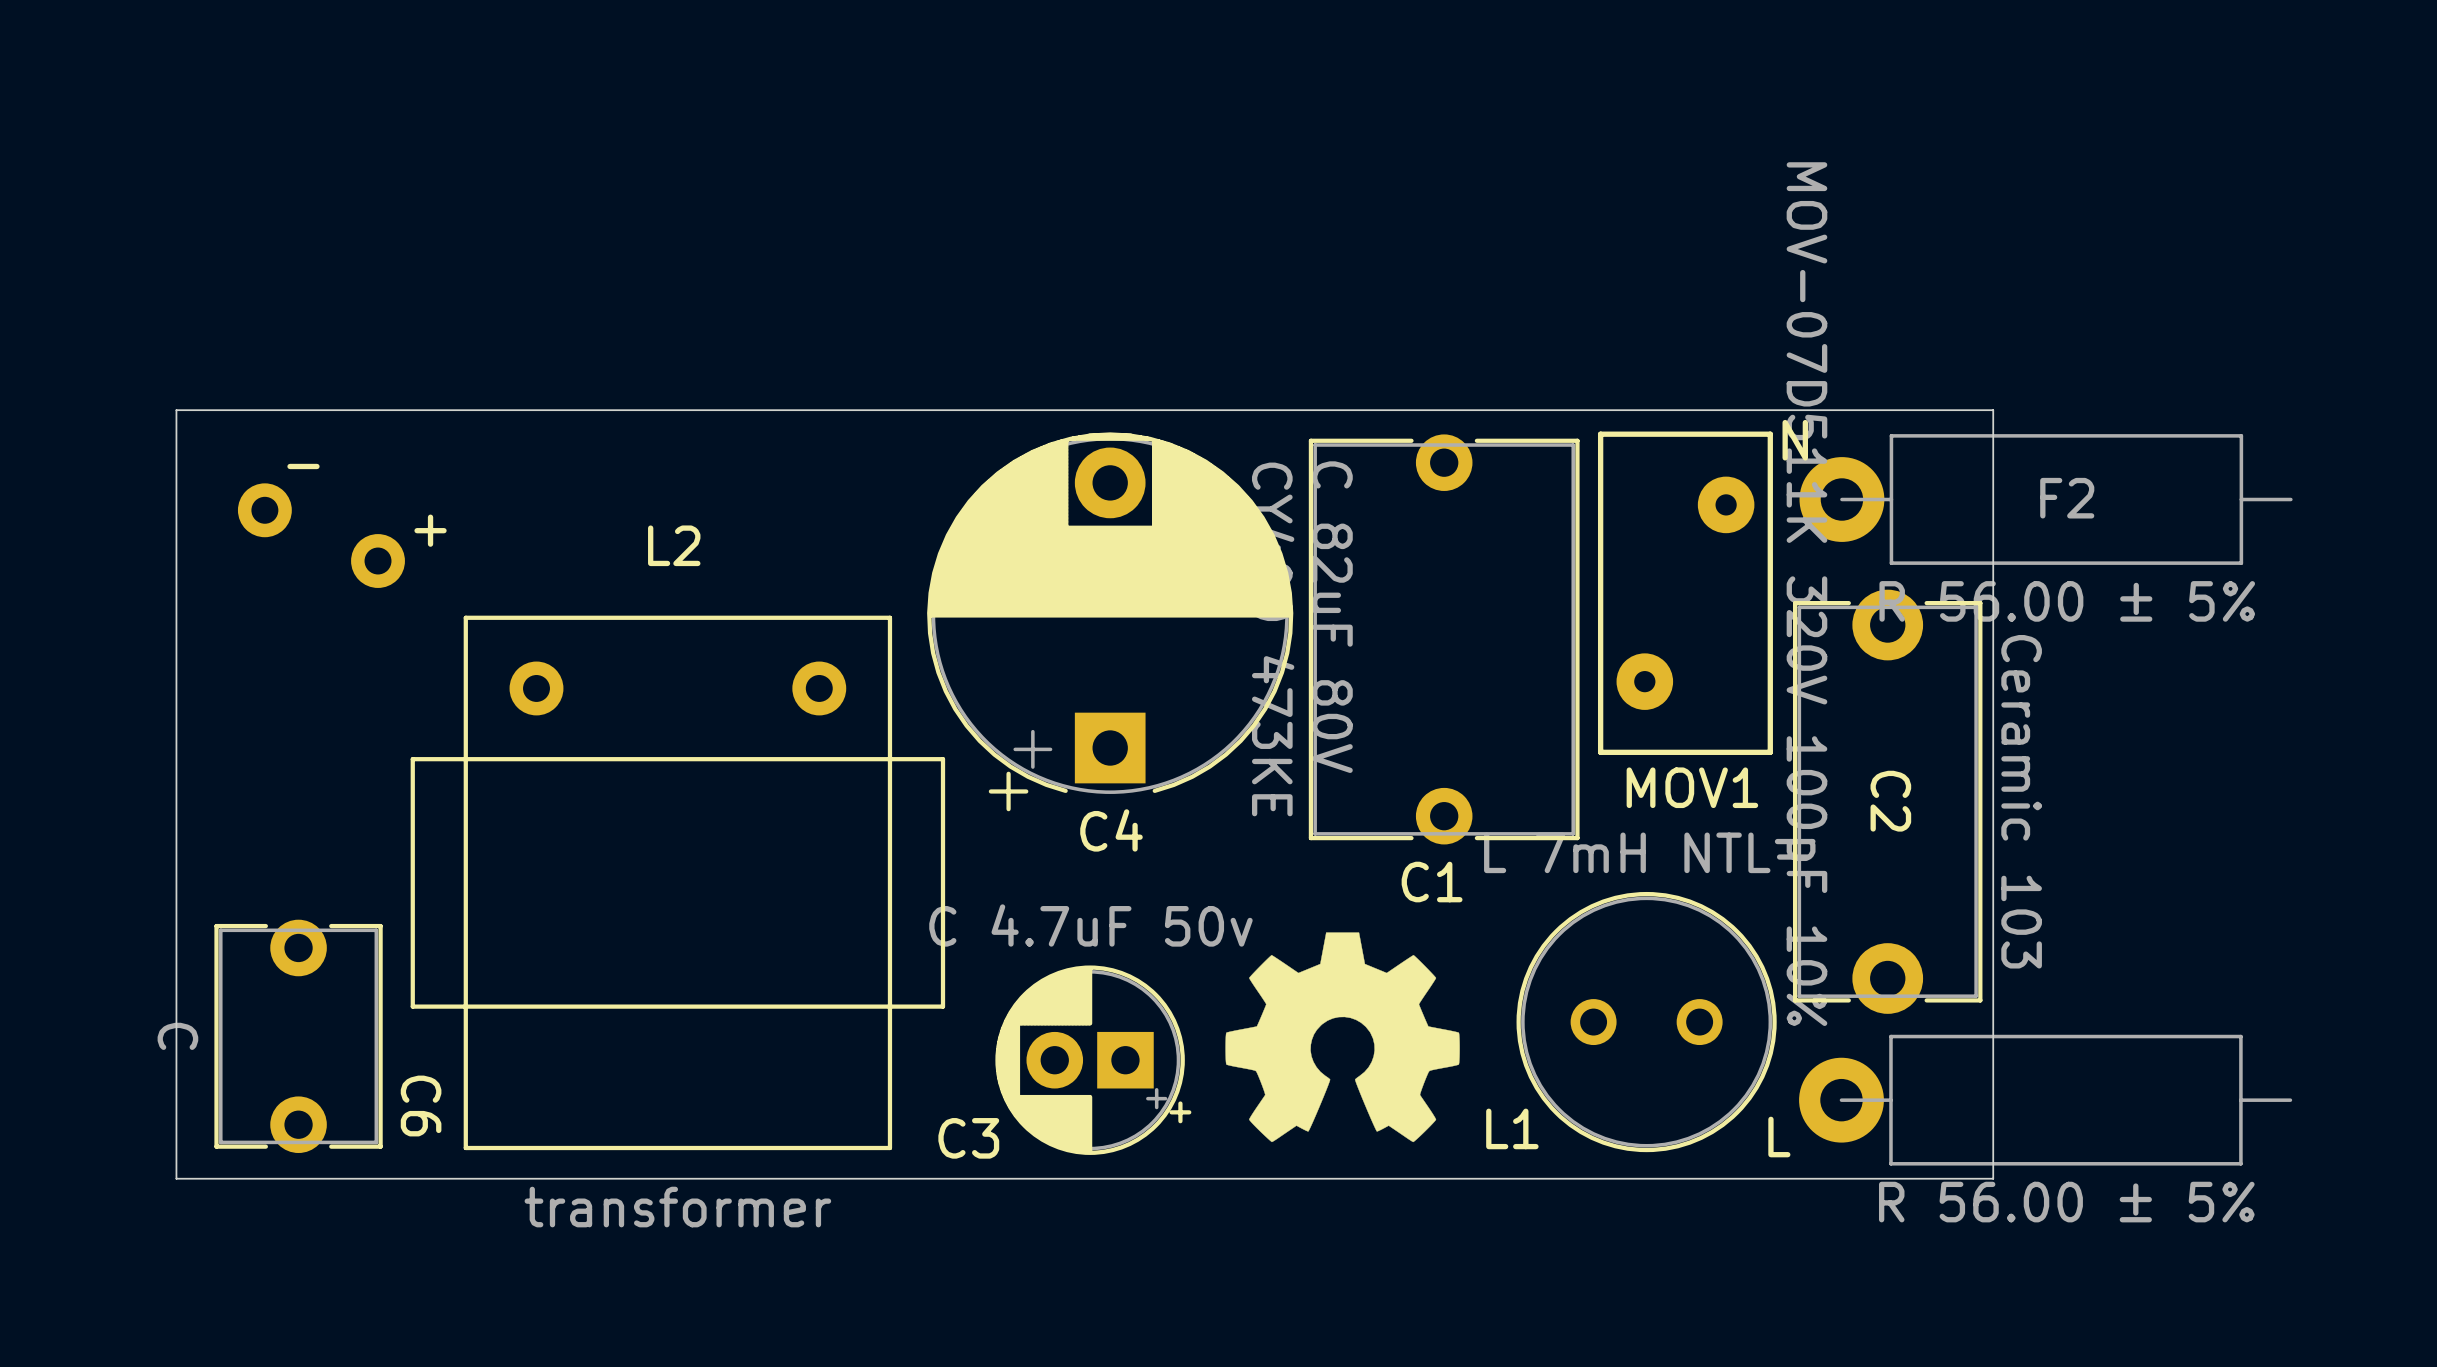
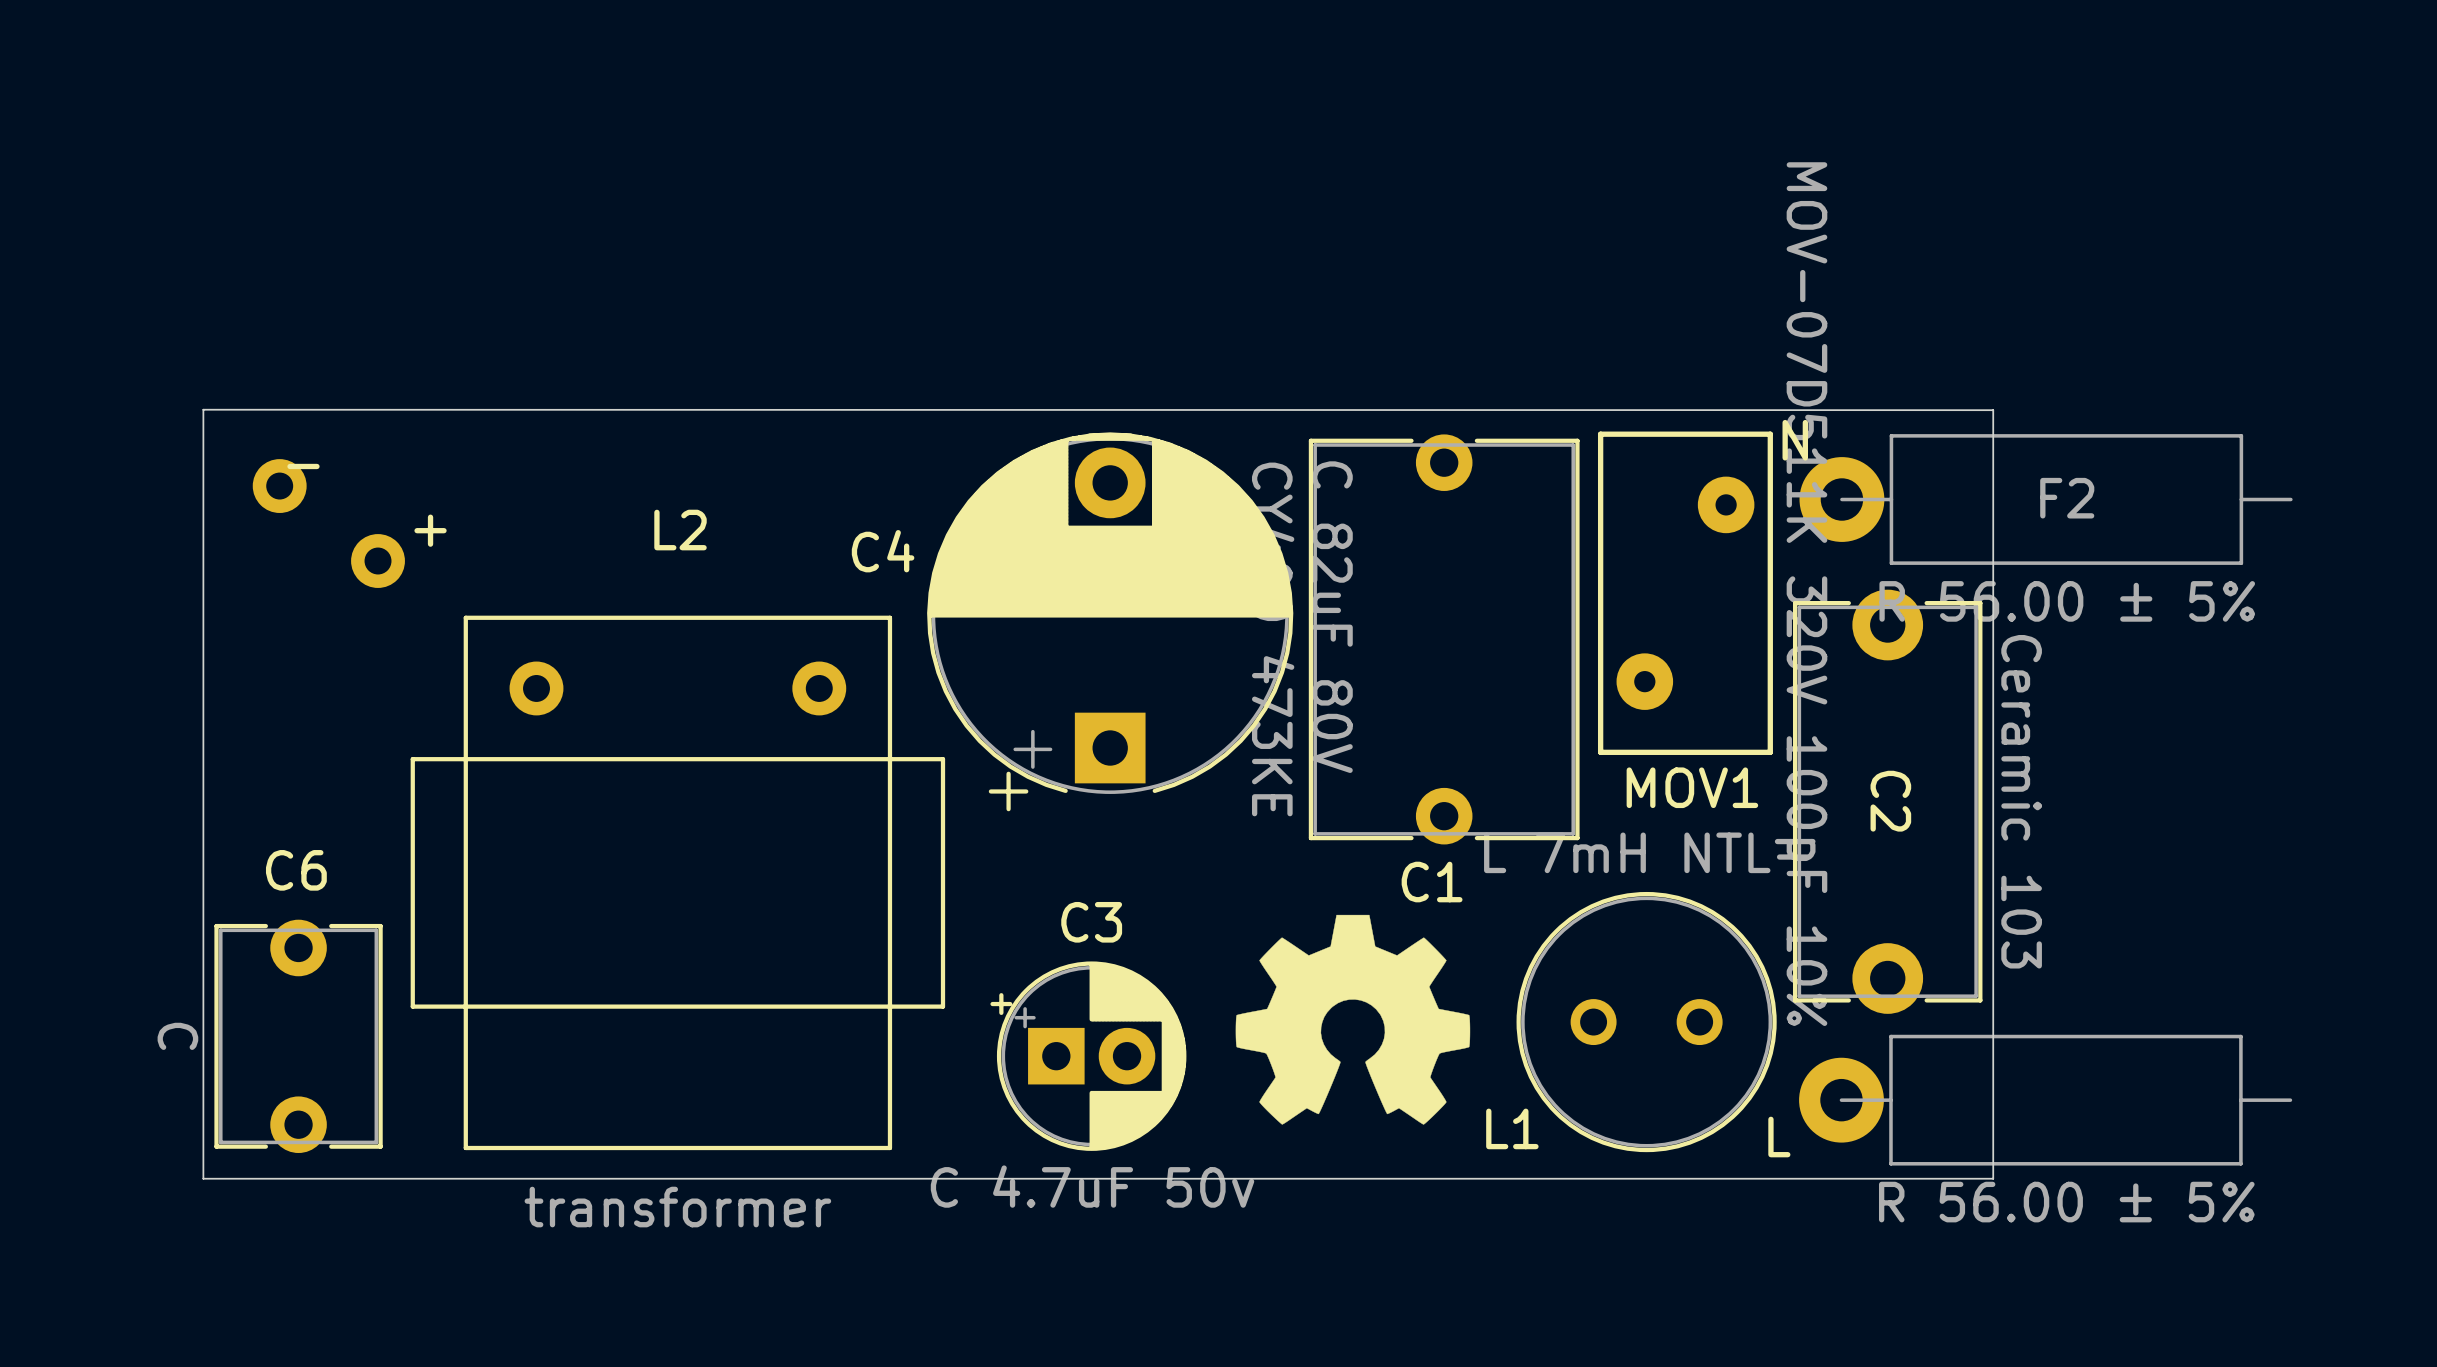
board edge: (1993, 410) (176, 410) (176, 1178) (203, 1178) -> (1993, 410) (203, 409) (203, 1178)
part position: (264, 510) -> (279, 486)
L2 name position: L2 (674, 545) -> L2 (680, 530)
C4 name position: C4 (1111, 830) -> C4 (883, 551)
drawing position: (1342, 1037) -> (1352, 1019)
C3 rotation: 0° (1093, 1060) -> 180° (1088, 1056)
C6 name rotation: 0° (421, 1106) -> 90° counterclockwise (296, 870)
C6 name position: C6 (421, 1106) -> C6 (296, 870)
C3 name position: C3 (968, 1138) -> C3 (1091, 922)

